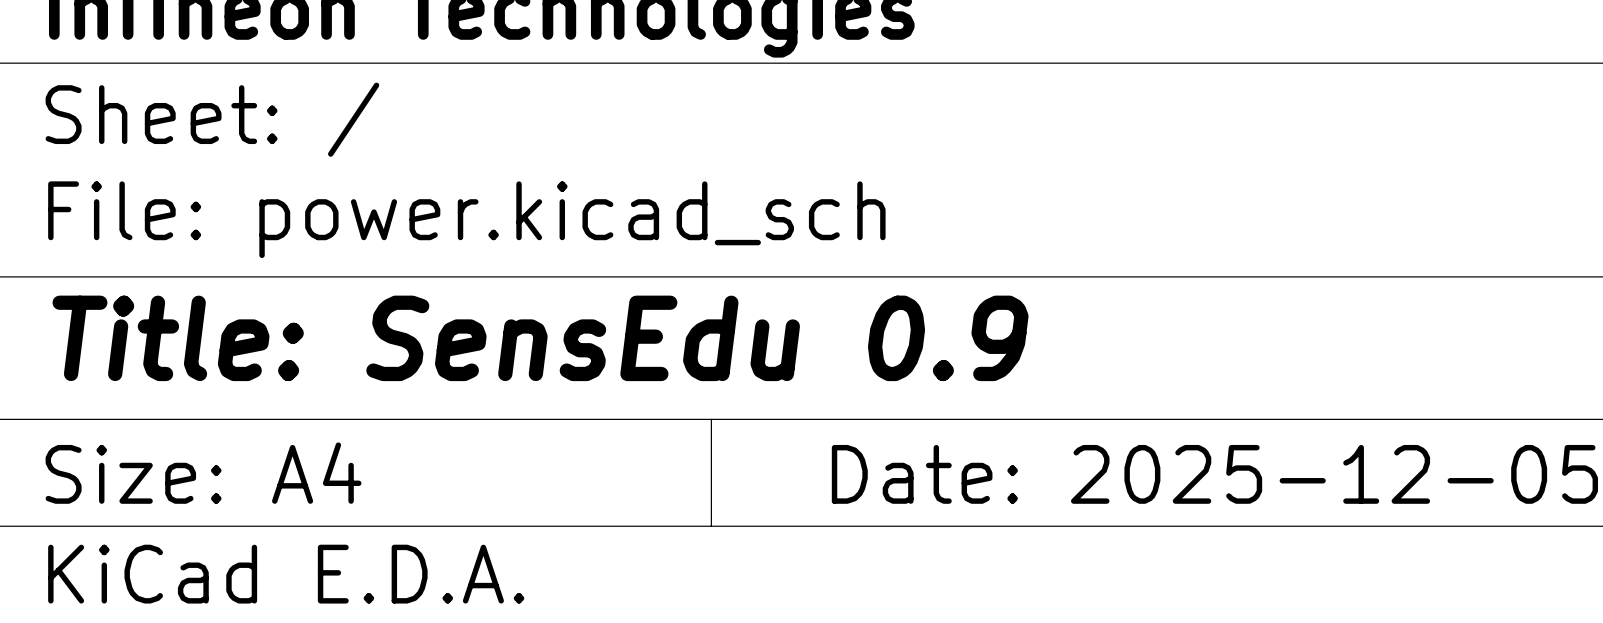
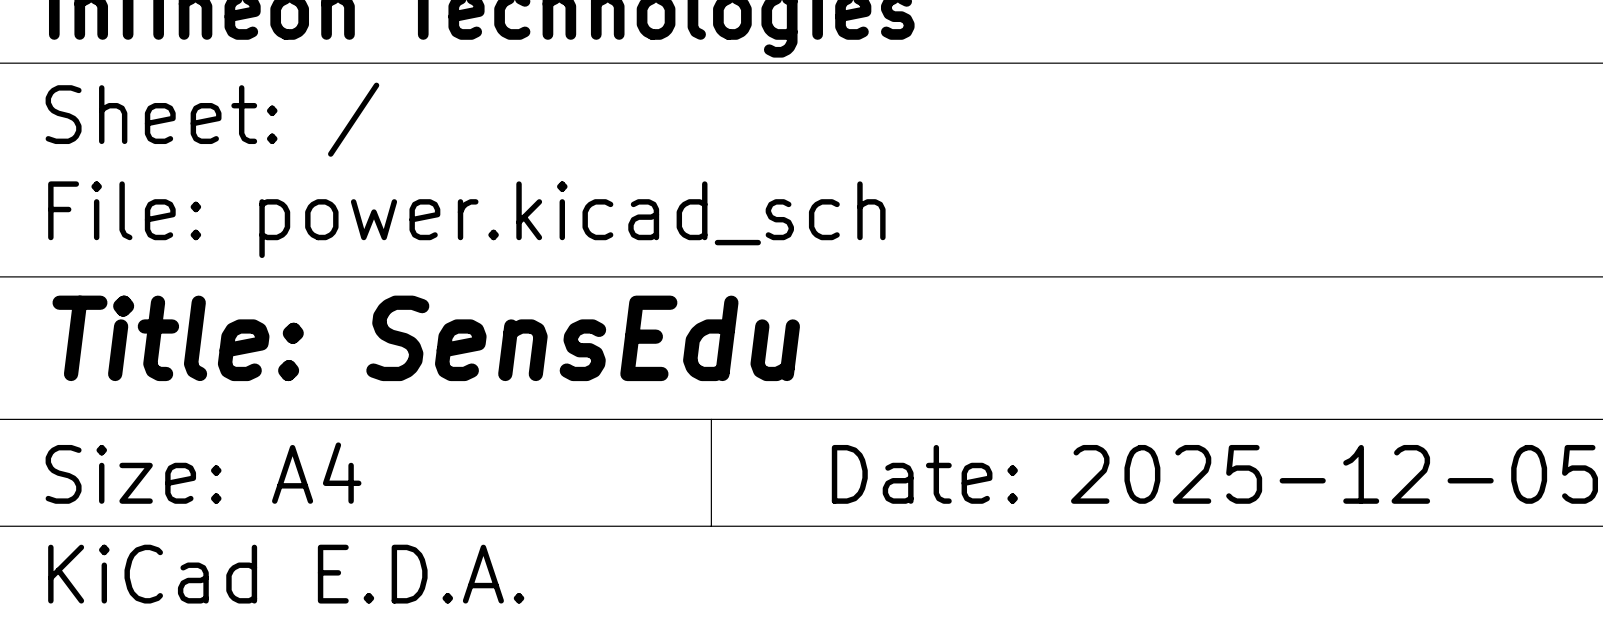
title block: Title: SensEdu 0.9 (540, 338) -> Title: SensEdu (426, 338)

